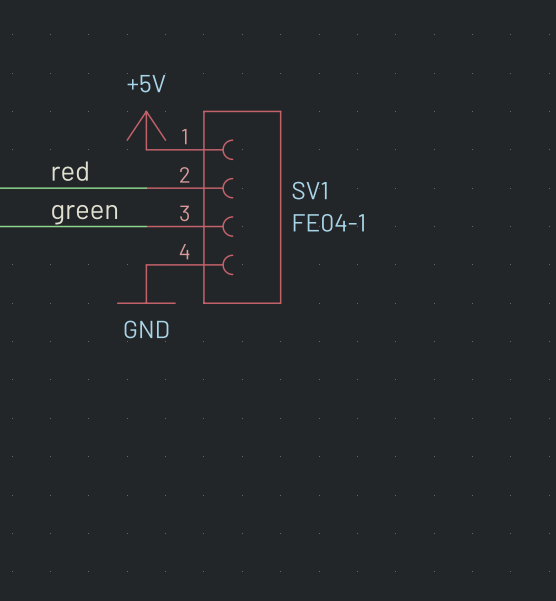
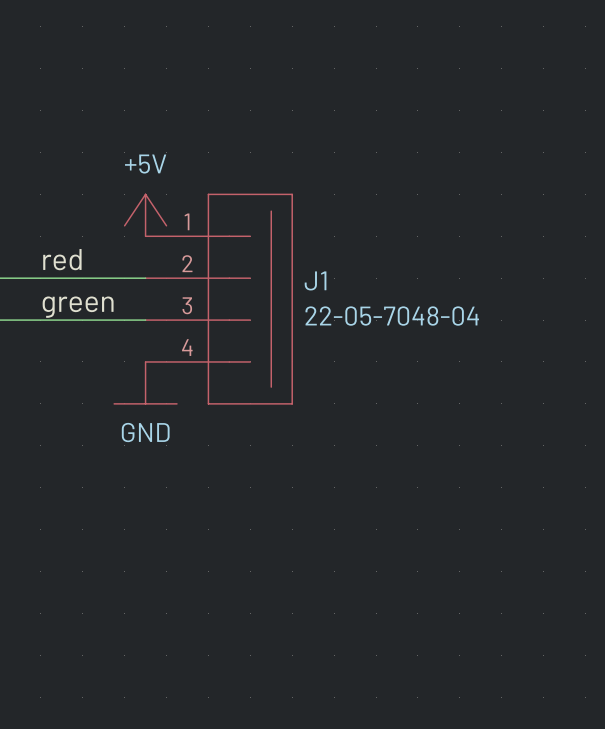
SV1: FE04-1 (213, 207) -> none
J1: none -> 22-05-7048-04 (218, 299)

